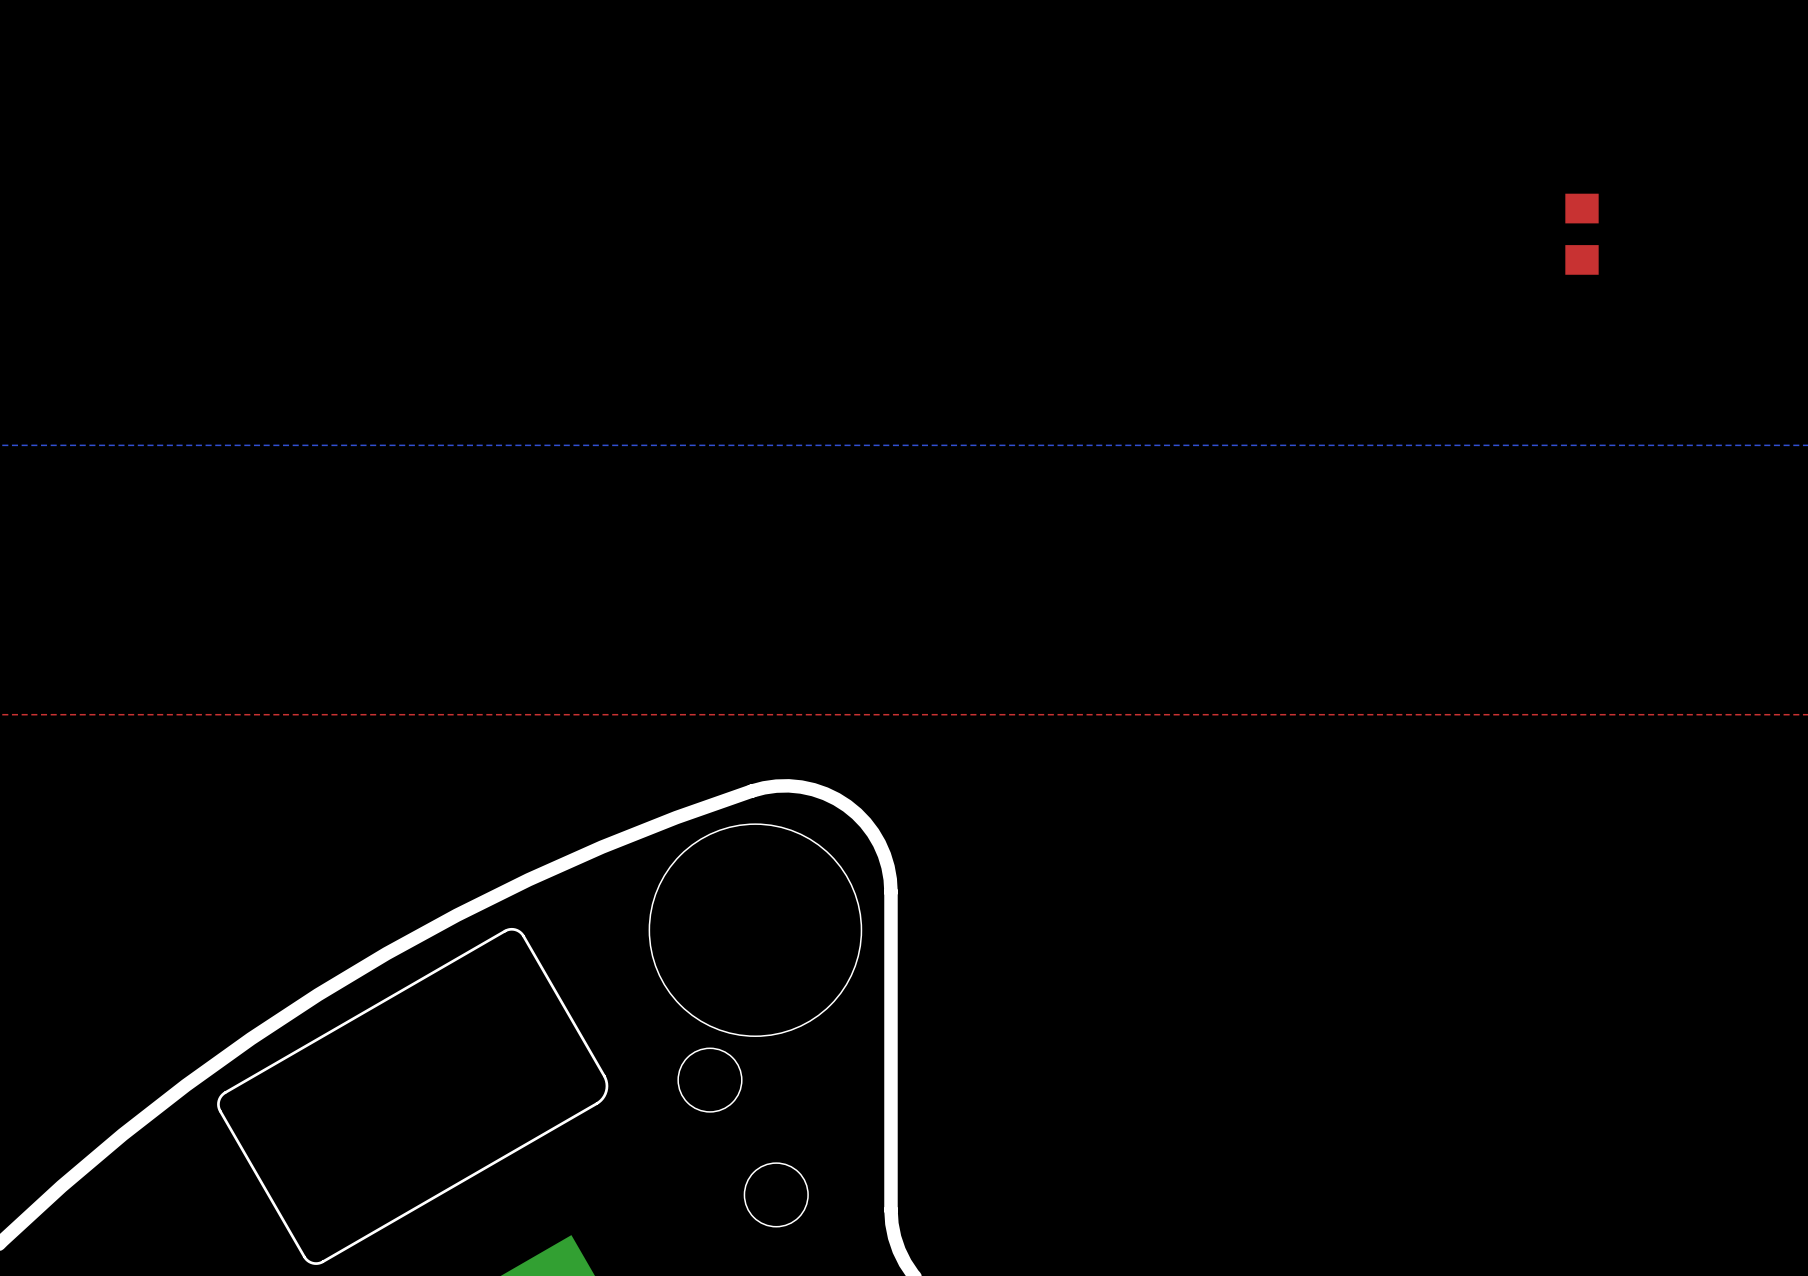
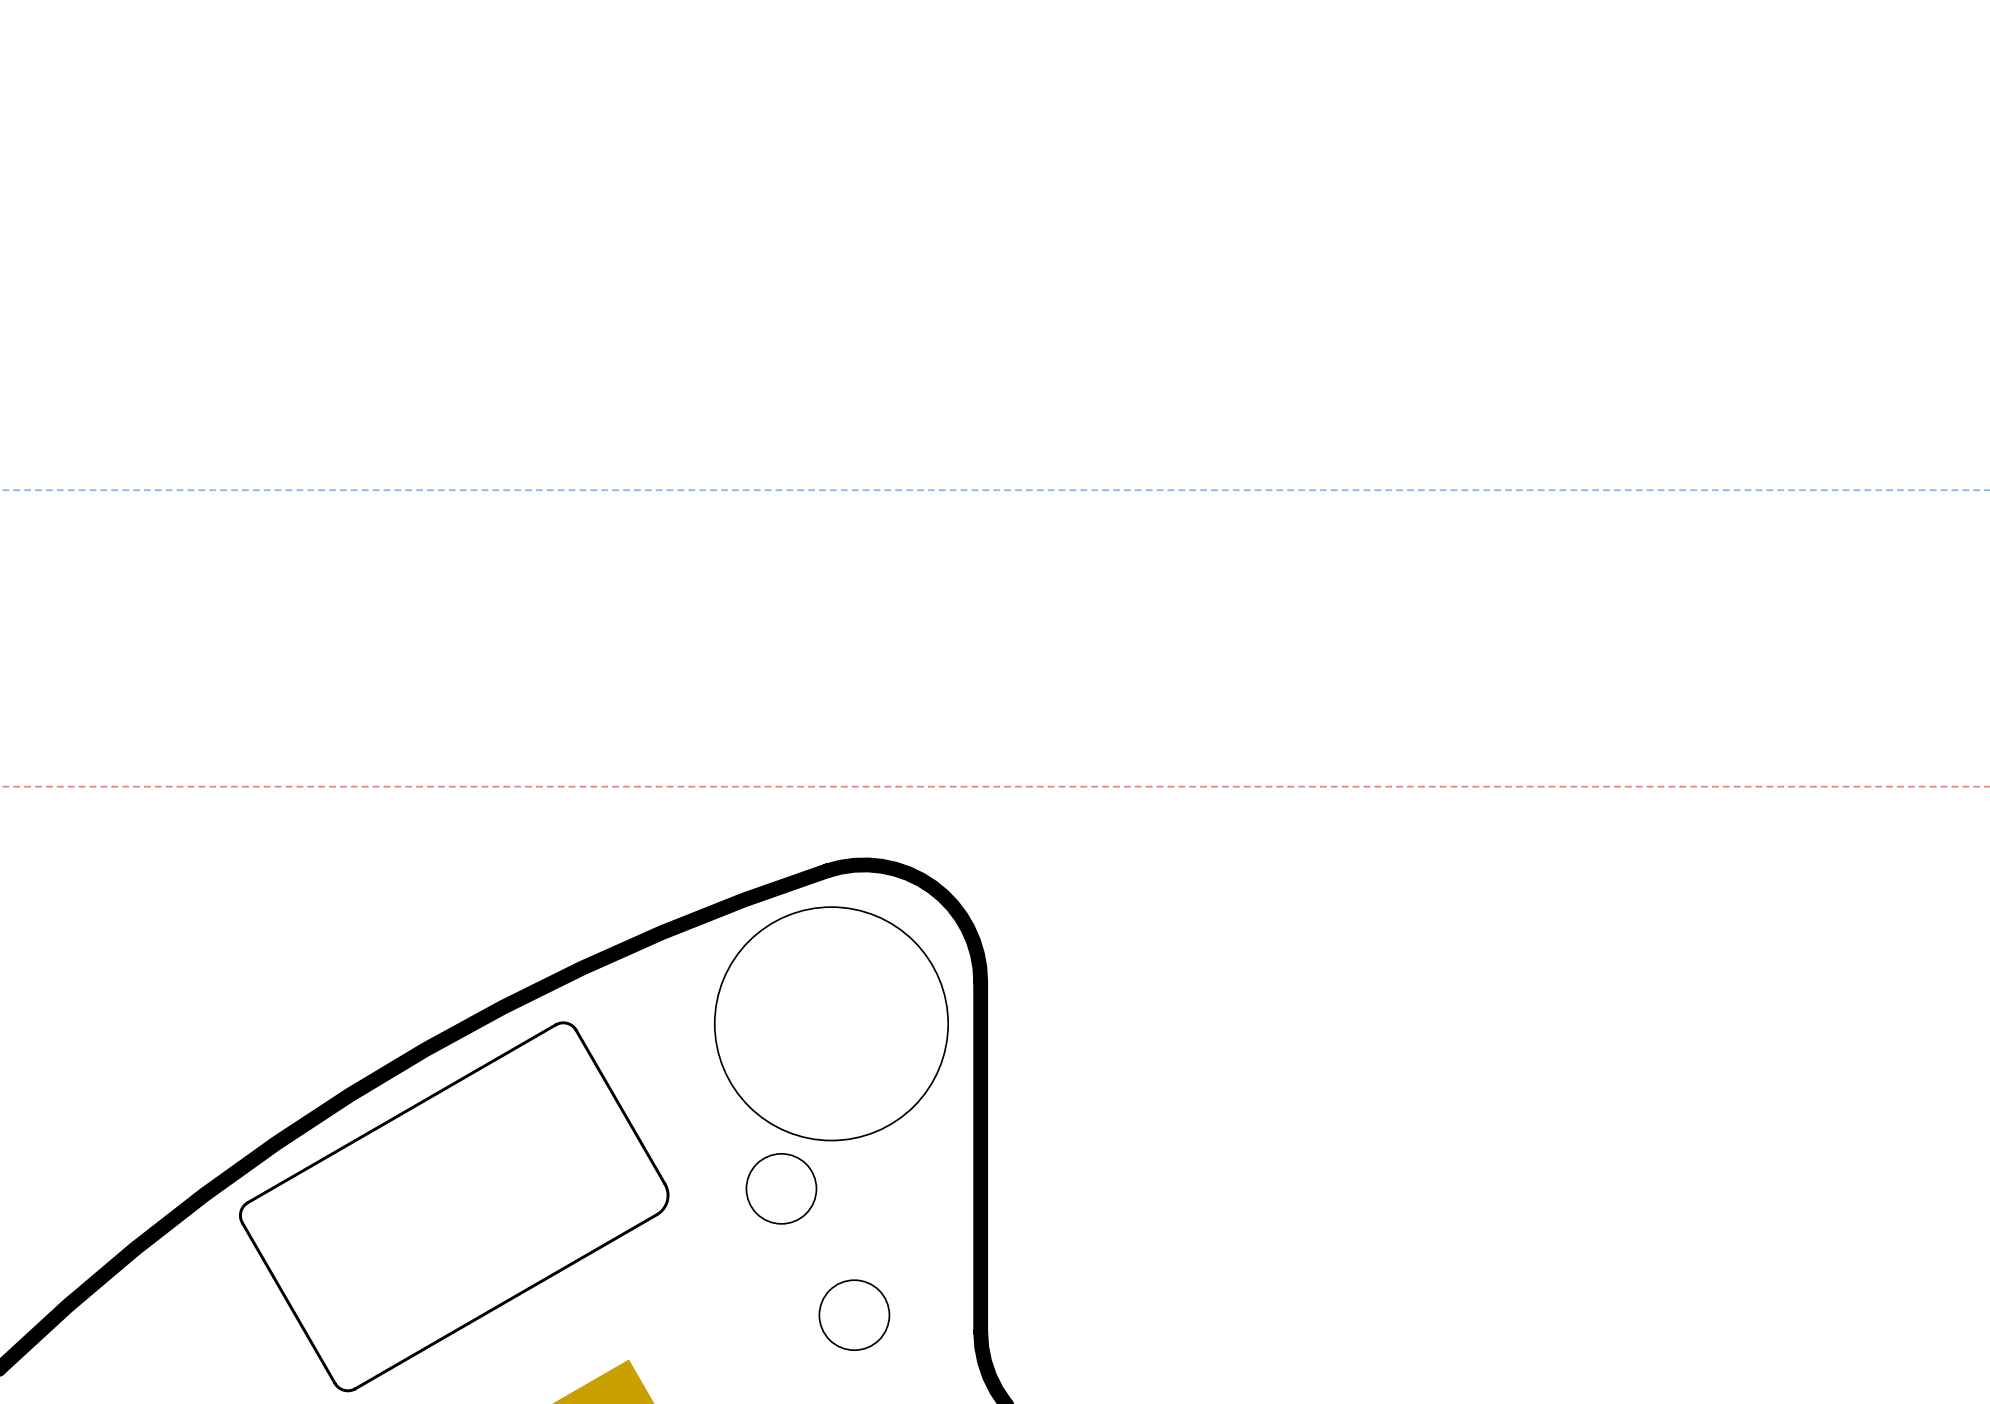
part: (1581, 234) -> none

